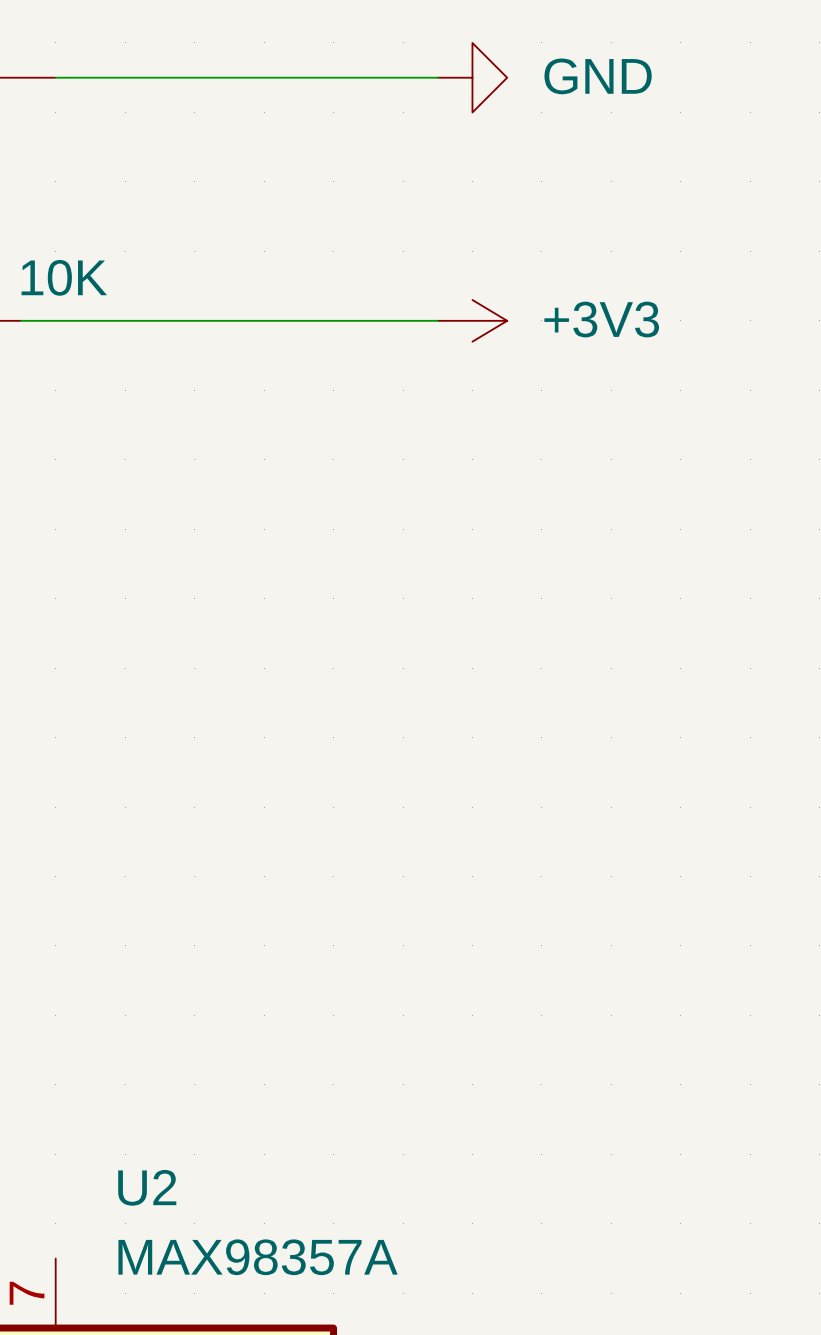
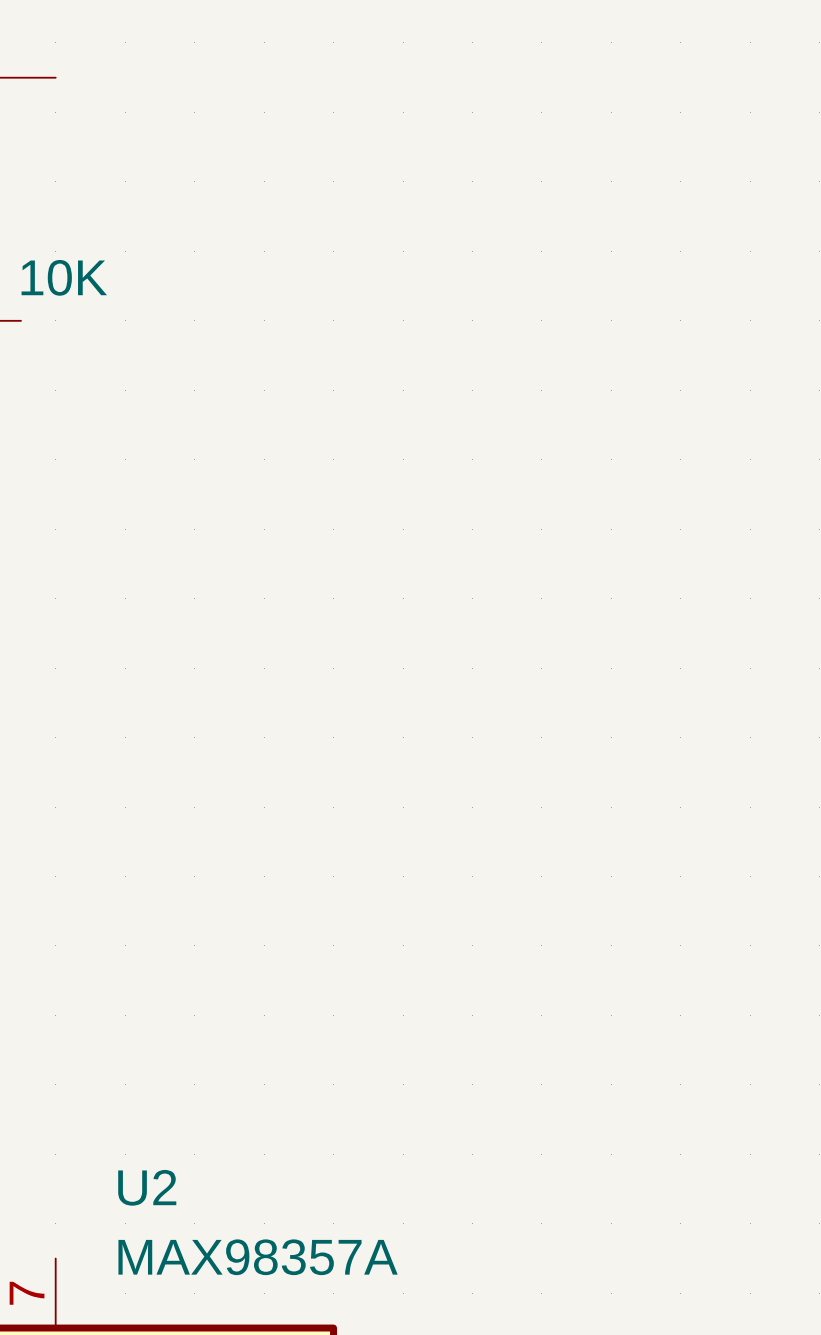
wire: (55, 77) (437, 77) -> none
power symbol: GND (472, 77) -> none
wire: (20, 320) (437, 320) -> none
power symbol: +3V3 (472, 320) -> none

